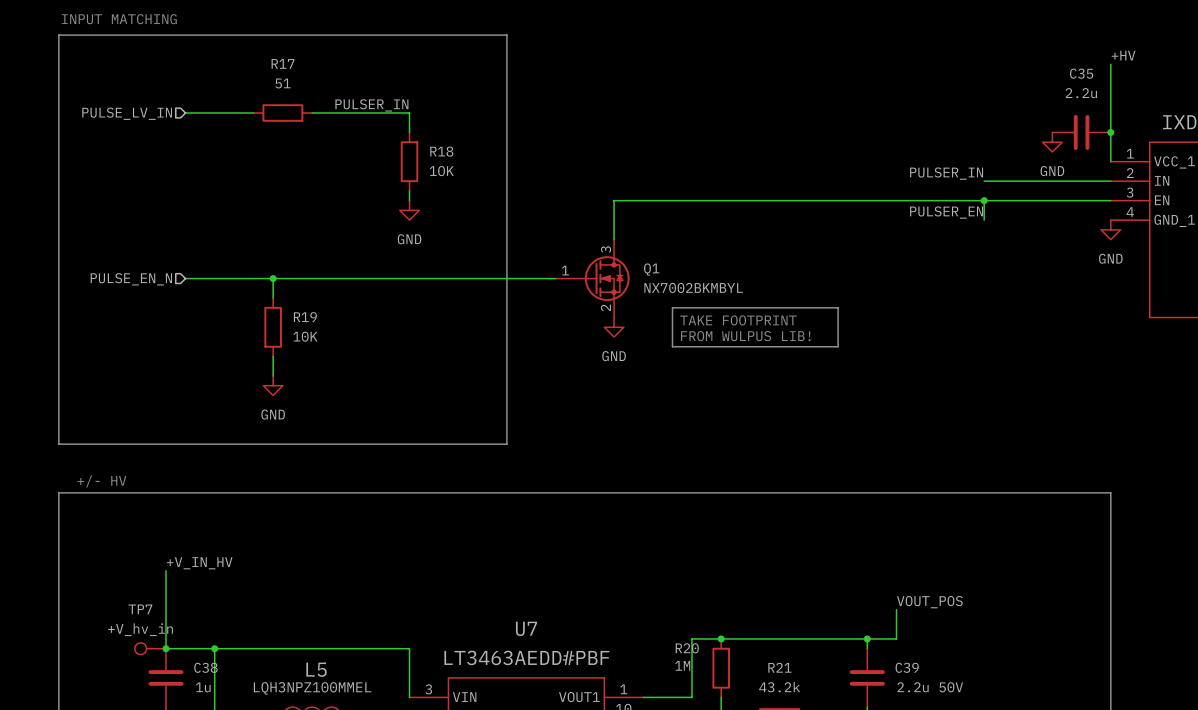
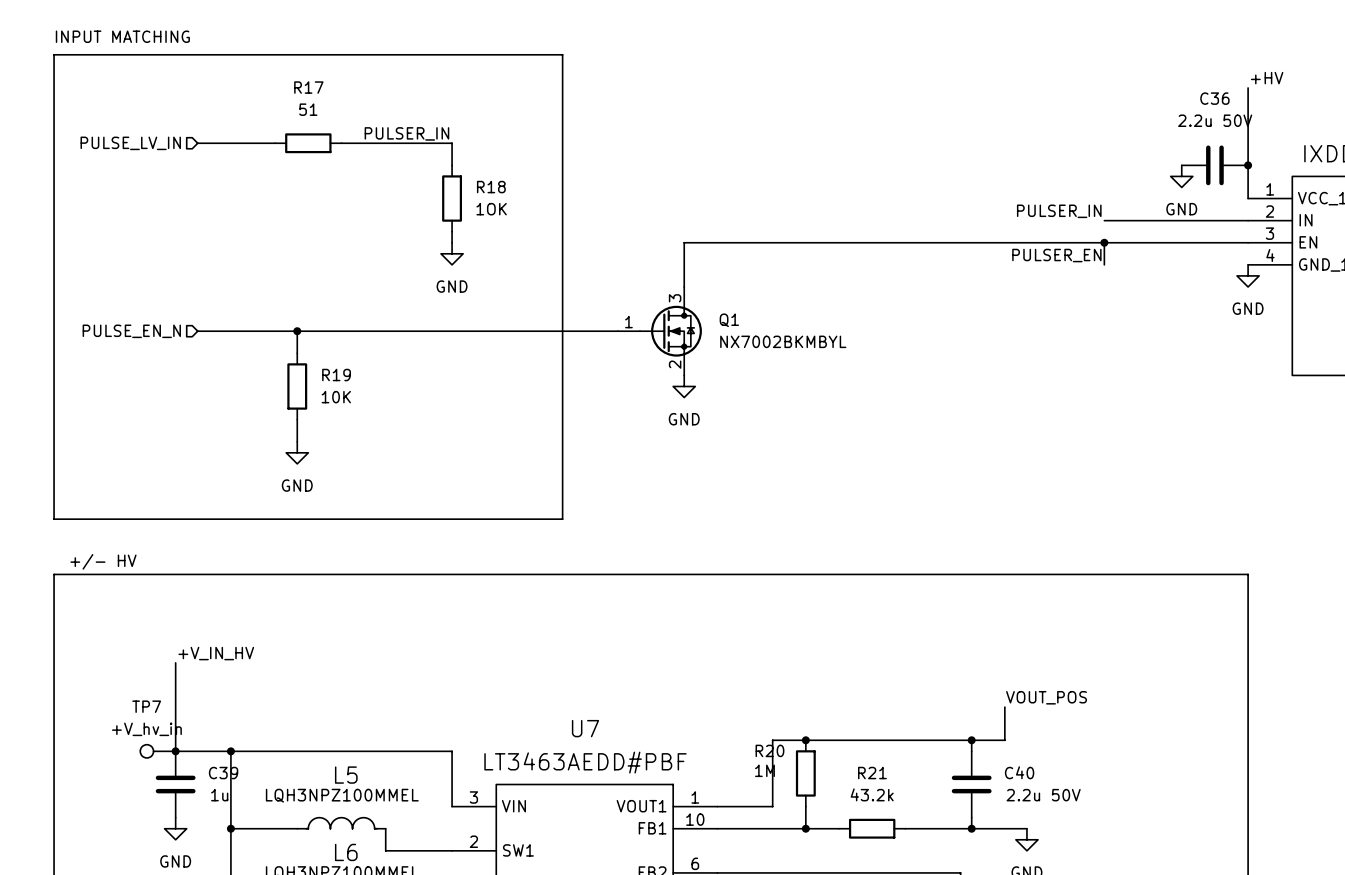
C35 name: C35 (1081, 73) -> C36 (1214, 98)
C35 value: 2.2u (1081, 93) -> 2.2u 50V (1215, 120)
line: (672, 307) (838, 307) (838, 346) (672, 346) (672, 307) -> none
text: TAKE FOOTPRINT (738, 320) -> none
text: FROM WULPUS LIB! (745, 336) -> none
C38 name: C38 (205, 667) -> C39 (223, 773)
C39 name: C39 (907, 667) -> C40 (1019, 772)

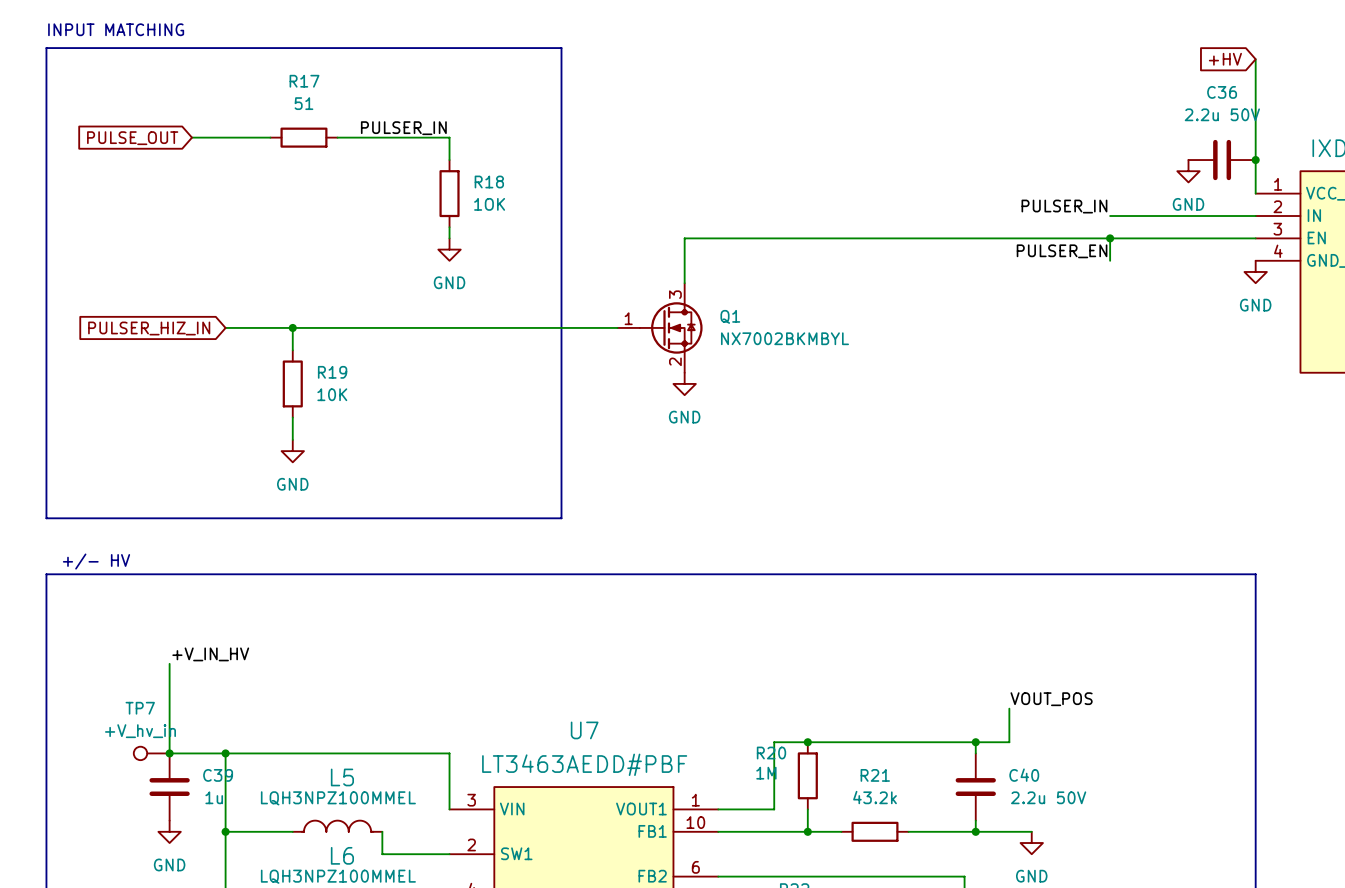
global label: none -> +HV (1225, 59)
wire: none -> (1255, 59) (1255, 81)
label: +HV (1267, 78) -> none
hierarchical label: PULSE_LV_IN (130, 143) -> none
global label: none -> PULSE_OUT (132, 138)
hierarchical label: PULSE_EN_N (131, 331) -> none
global label: none -> PULSER_HIZ_IN (149, 328)
wire: (197, 331) (230, 331) -> none

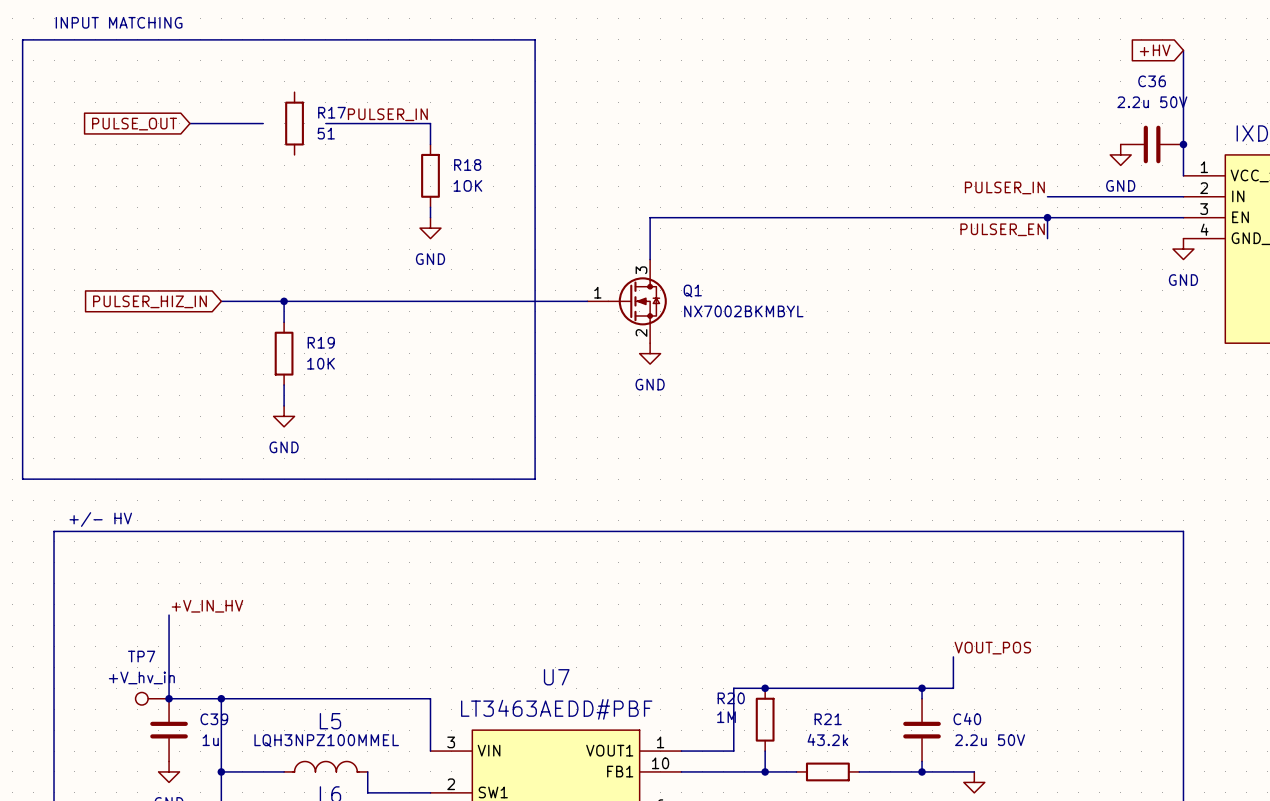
line: (46, 48) (46, 518) -> (54, 39) (22, 39) (22, 479) (54, 479)
R17 name position: R17 (304, 81) -> R17 (331, 112)
R17 rotation: 0° (303, 137) -> 90° clockwise (294, 123)

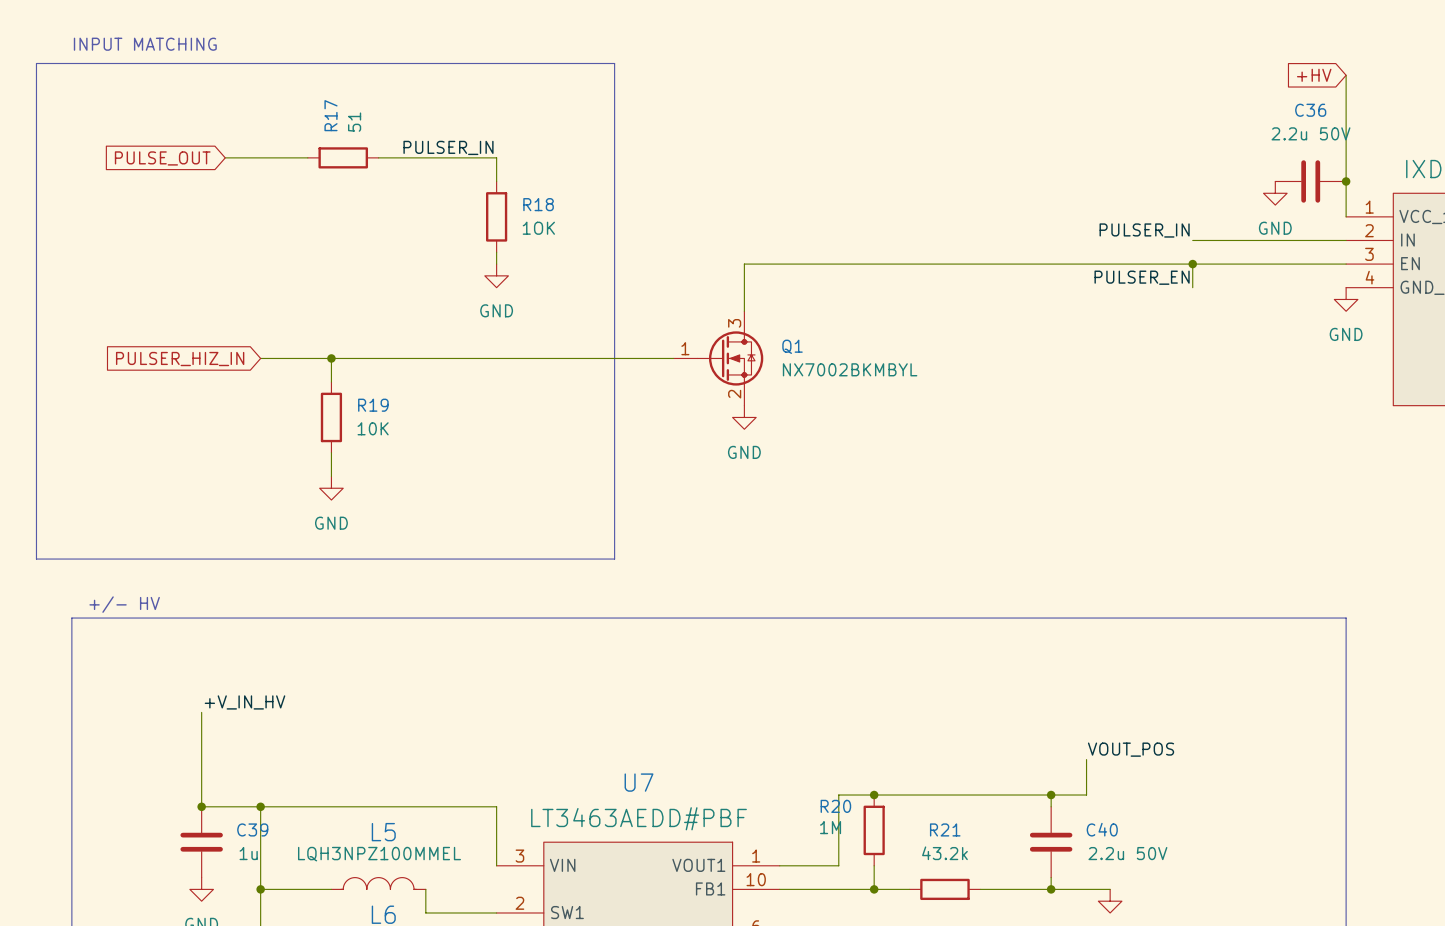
R17 name position: R17 (331, 112) -> R17 (330, 115)
R17 rotation: 0° (294, 123) -> 90° clockwise (343, 157)
R17 value position: 51 (326, 133) -> 51 (354, 122)
TP7: +V_hv_in (152, 698) -> none

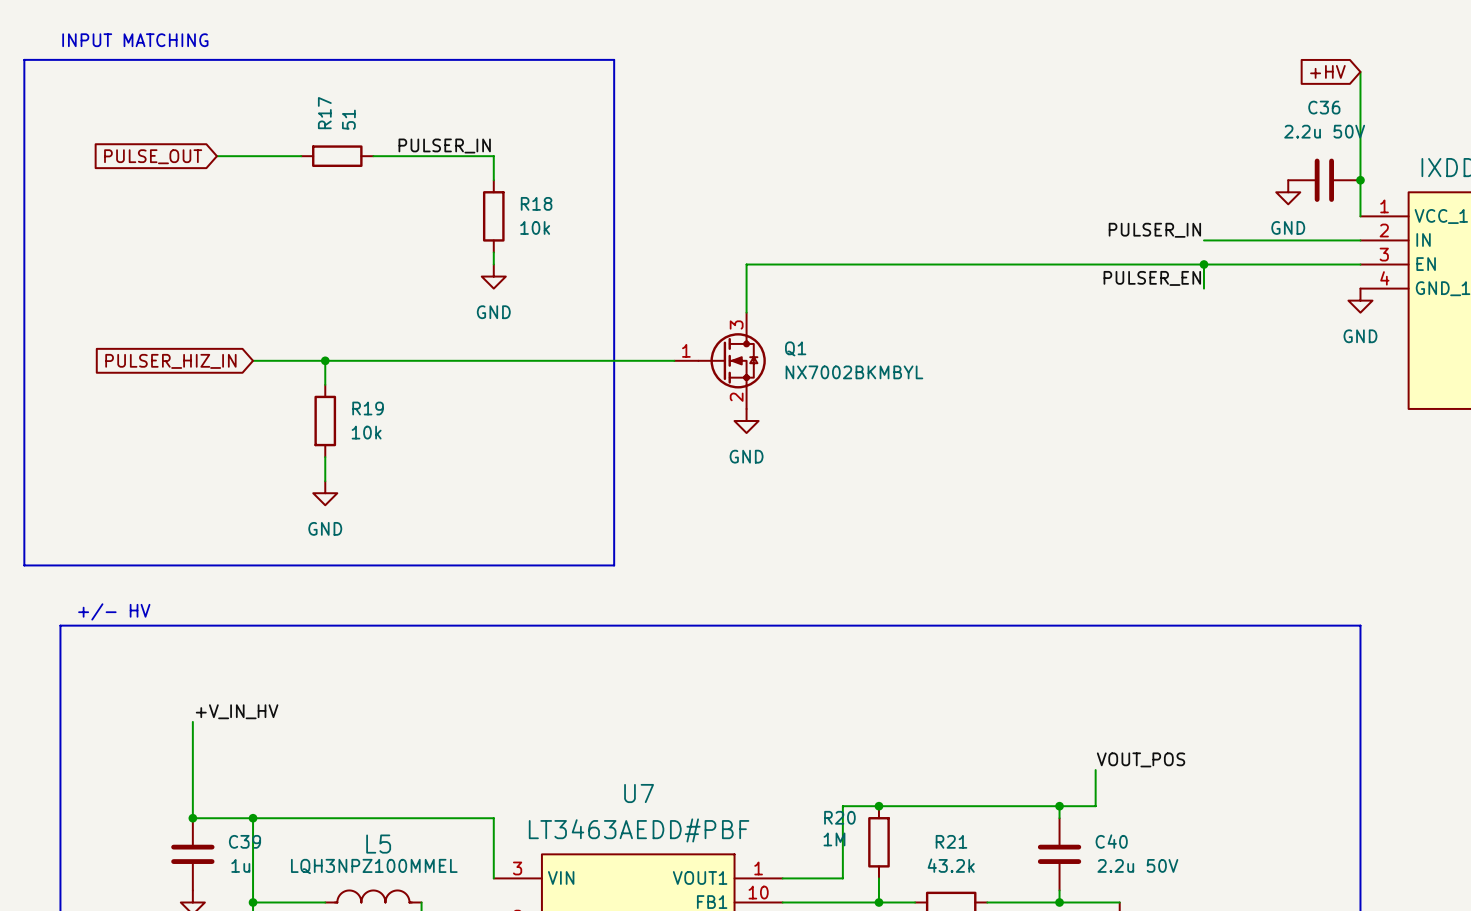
R18 value: 1OK (538, 228) -> 10k (535, 227)
R19 value: 10K (373, 428) -> 10k (366, 432)

